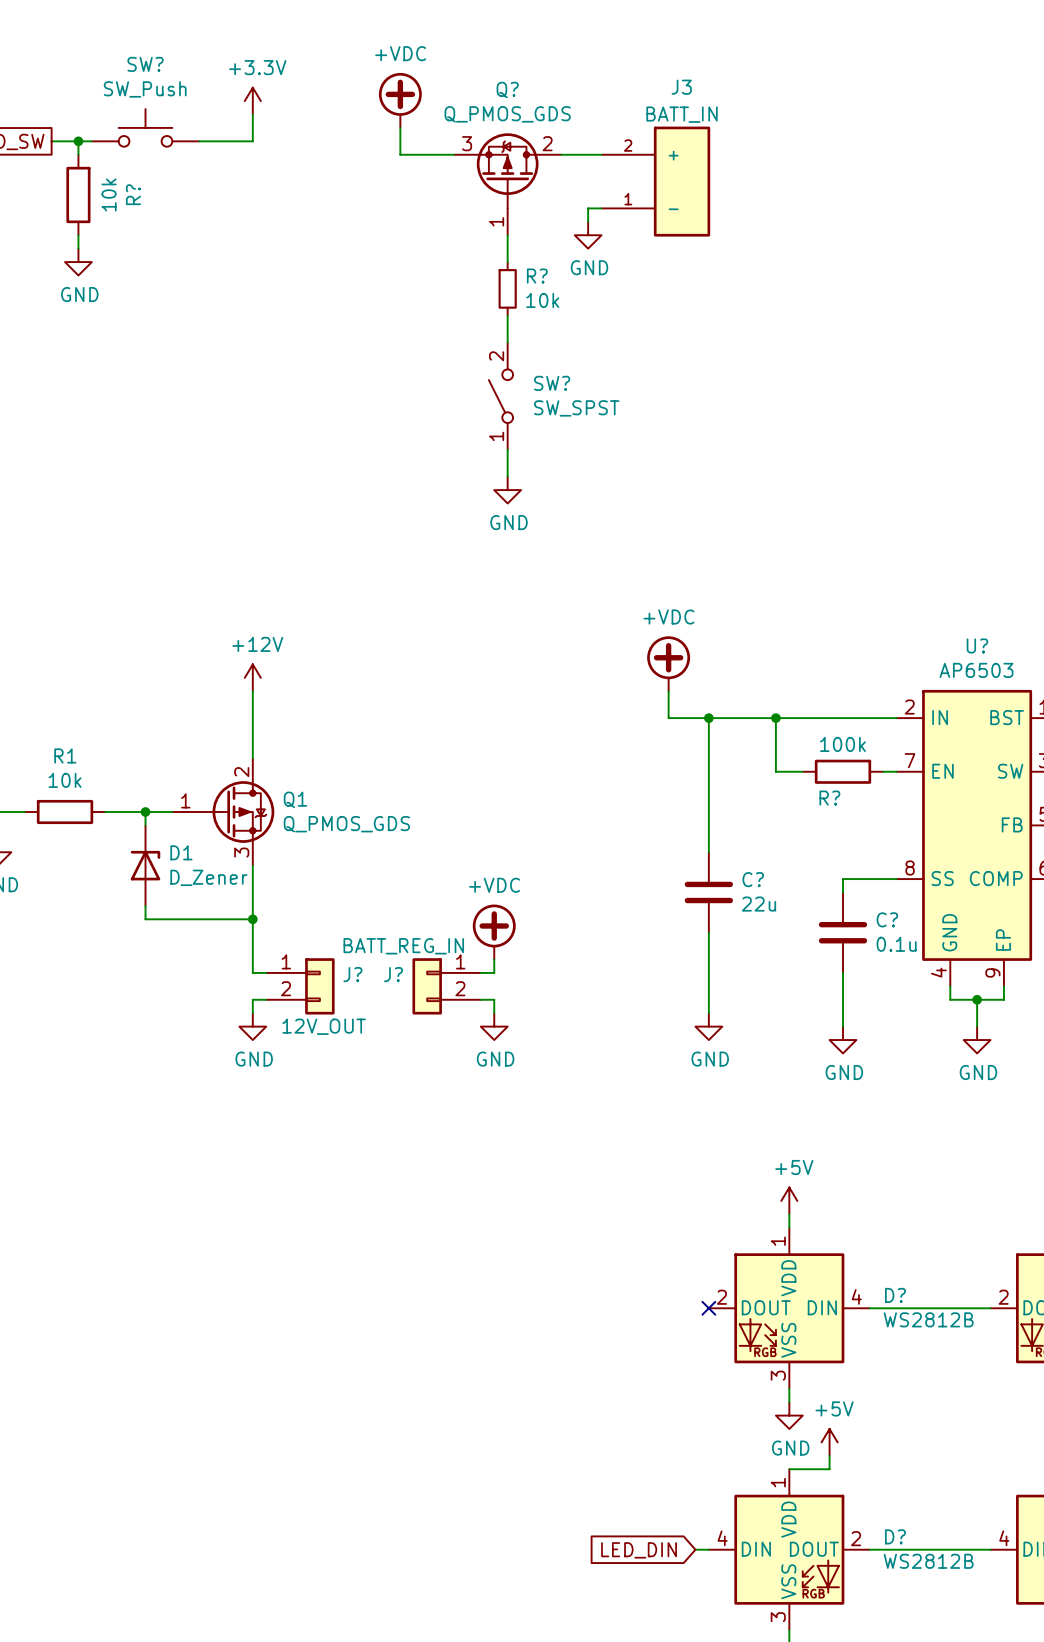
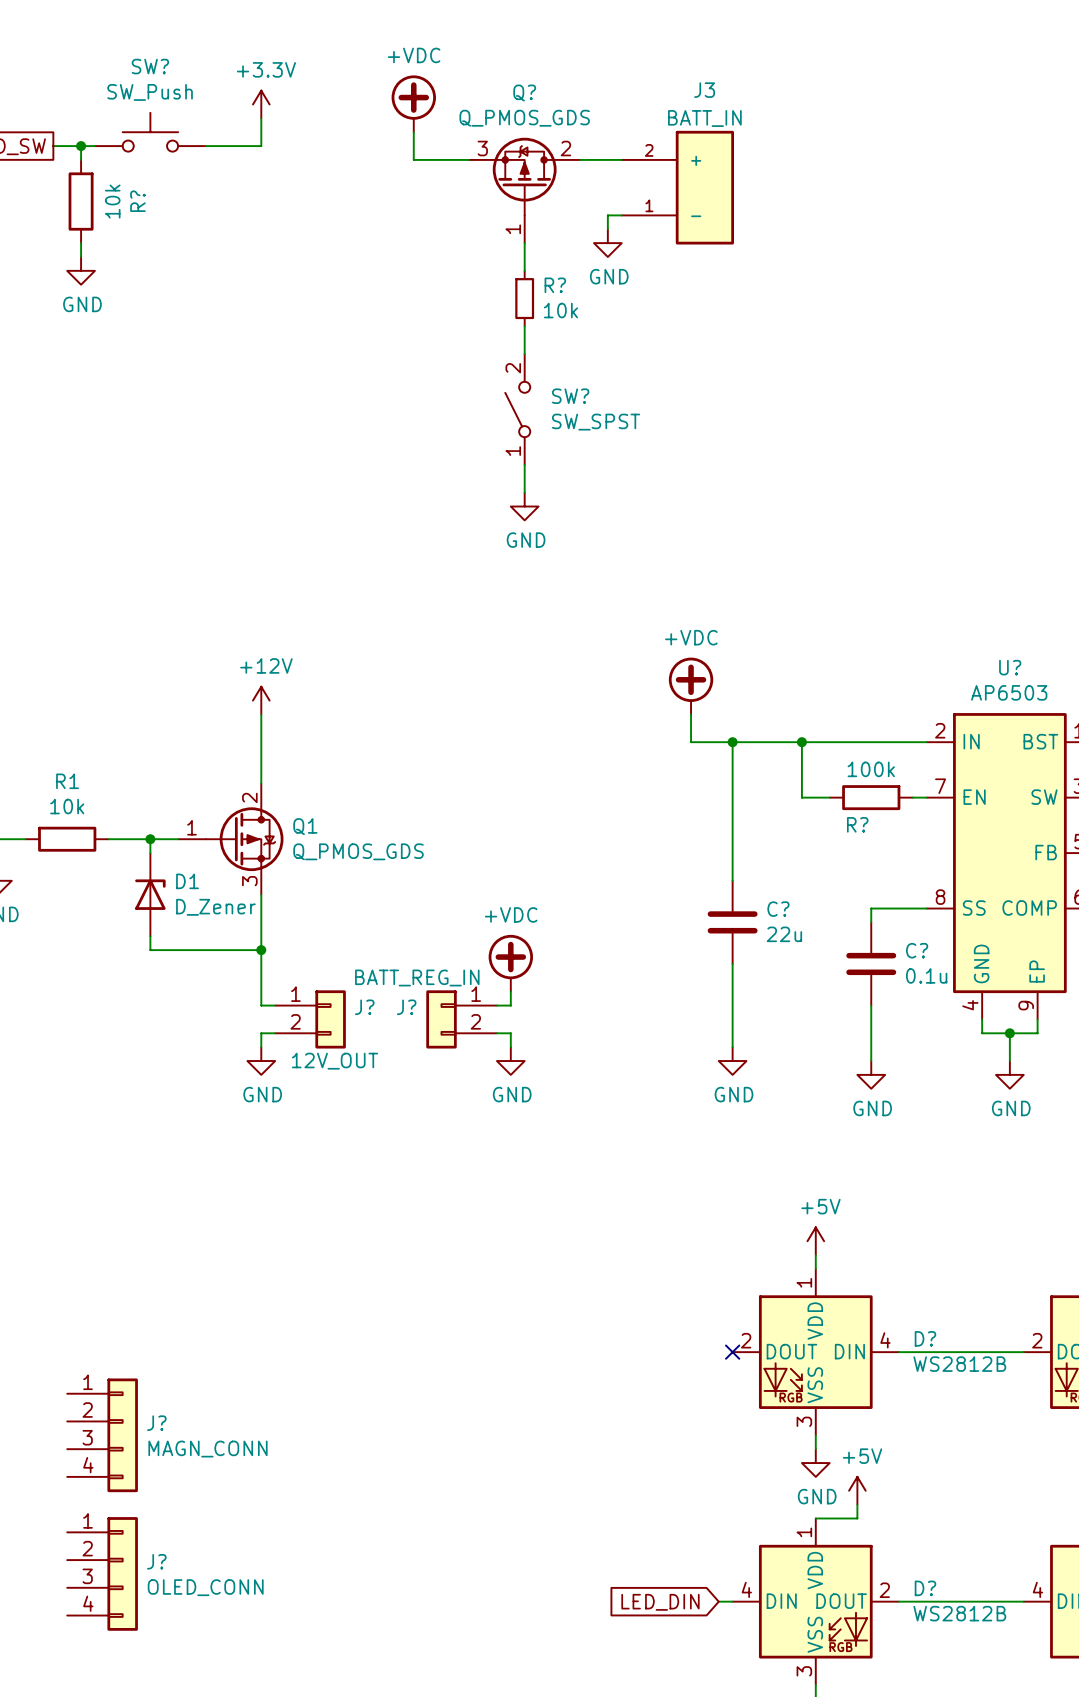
J?: none -> MAGN_CONN (102, 1435)
J?: none -> OLED_CONN (102, 1573)

